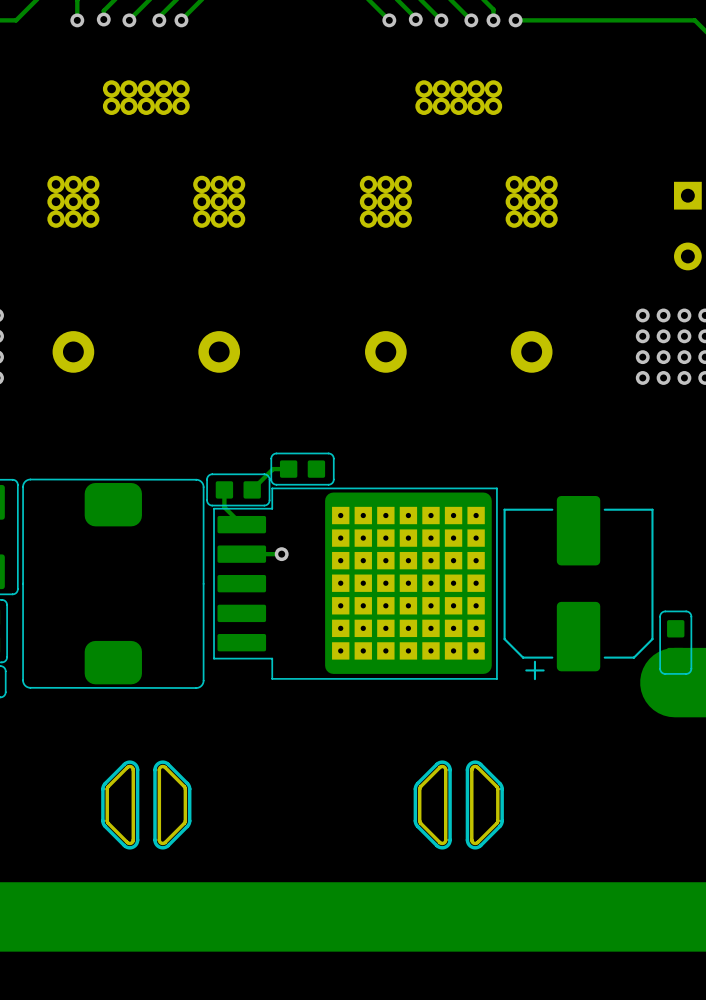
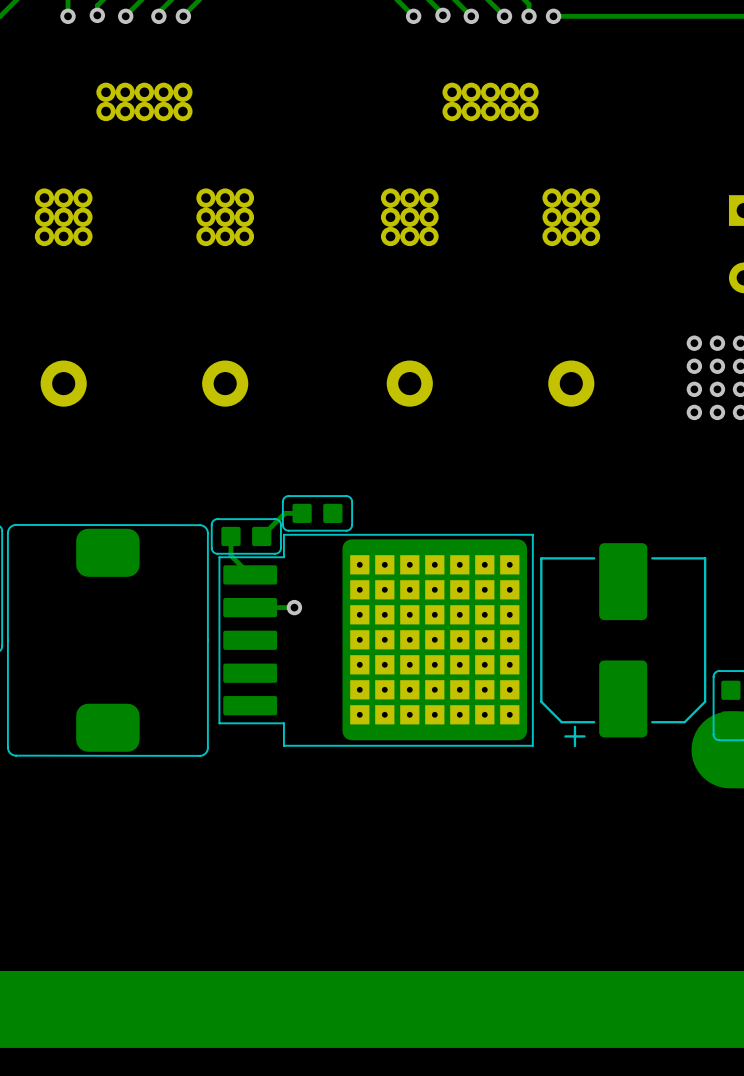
drawing: [101, 760, 192, 850] -> none
drawing: [413, 760, 504, 850] -> none

